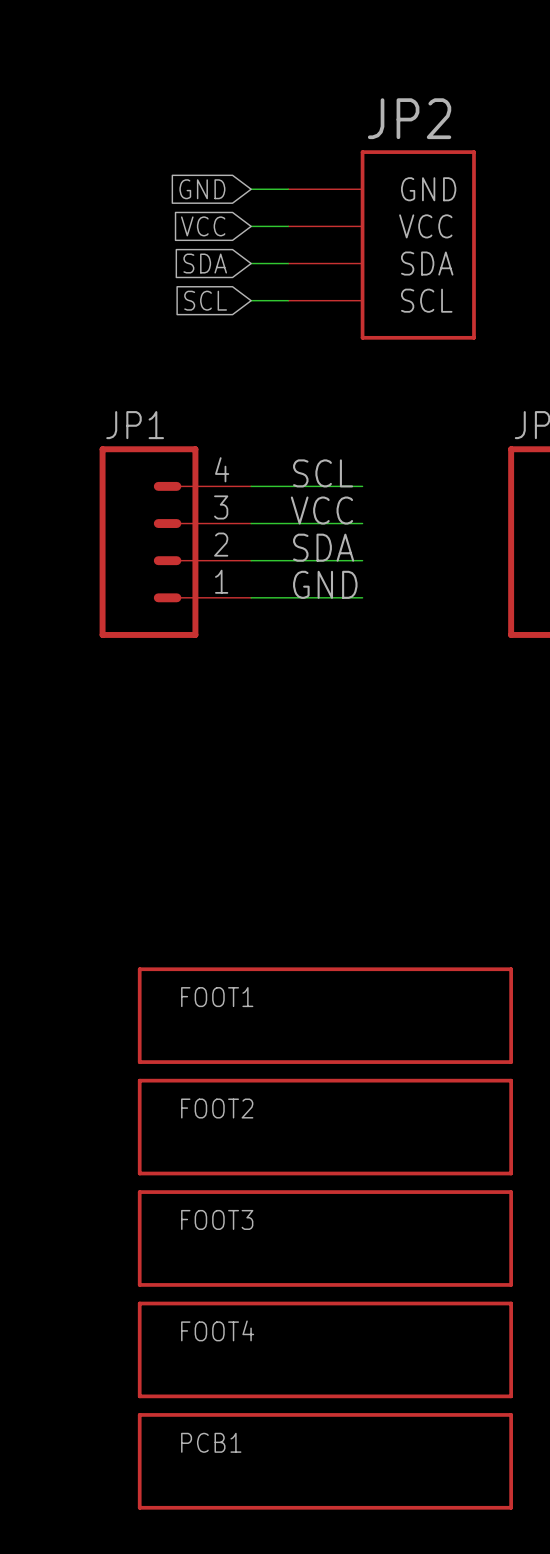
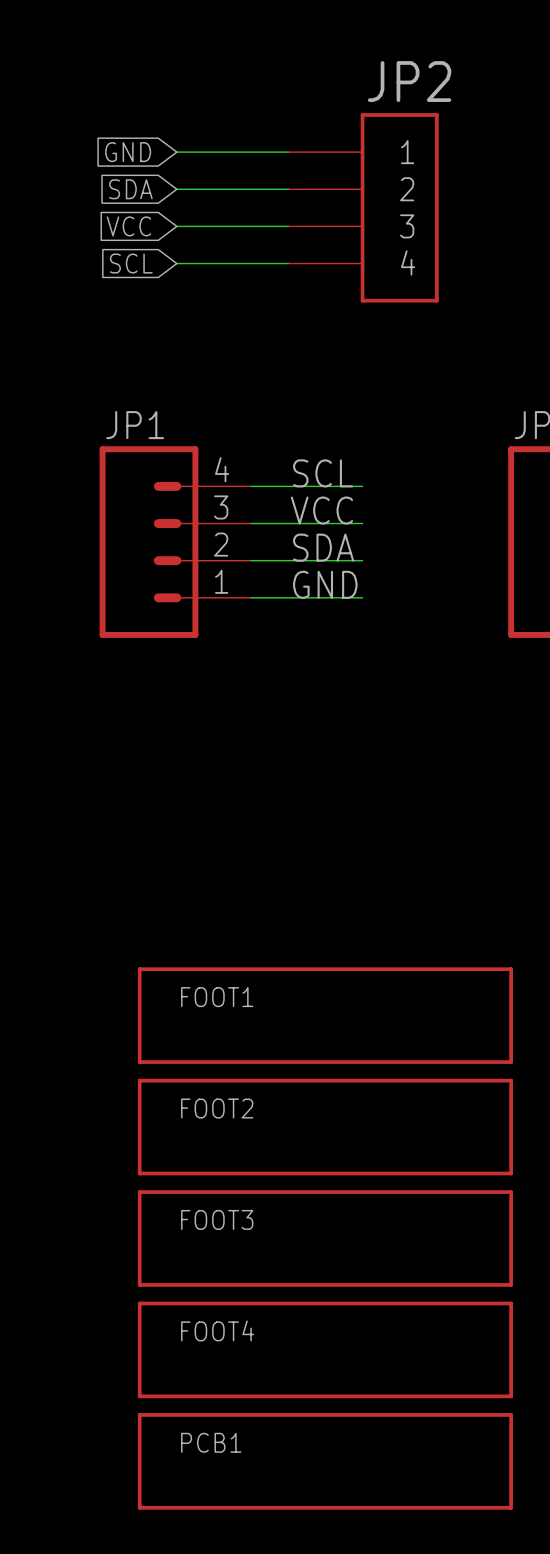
JP2 symbol: [288, 150, 476, 340] -> [288, 113, 439, 303]
wire: none -> (176, 152) (288, 152)
wire: none -> (176, 189) (251, 189)
global label position: GND (202, 189) -> GND (128, 152)
wire: none -> (176, 226) (251, 226)
global label position: VCC (203, 226) -> VCC (128, 226)
wire: none -> (176, 263) (251, 263)
global label position: SDA (205, 263) -> SDA (130, 189)
global label position: SCL (205, 300) -> SCL (131, 263)
wire: (251, 300) (288, 300) -> none

